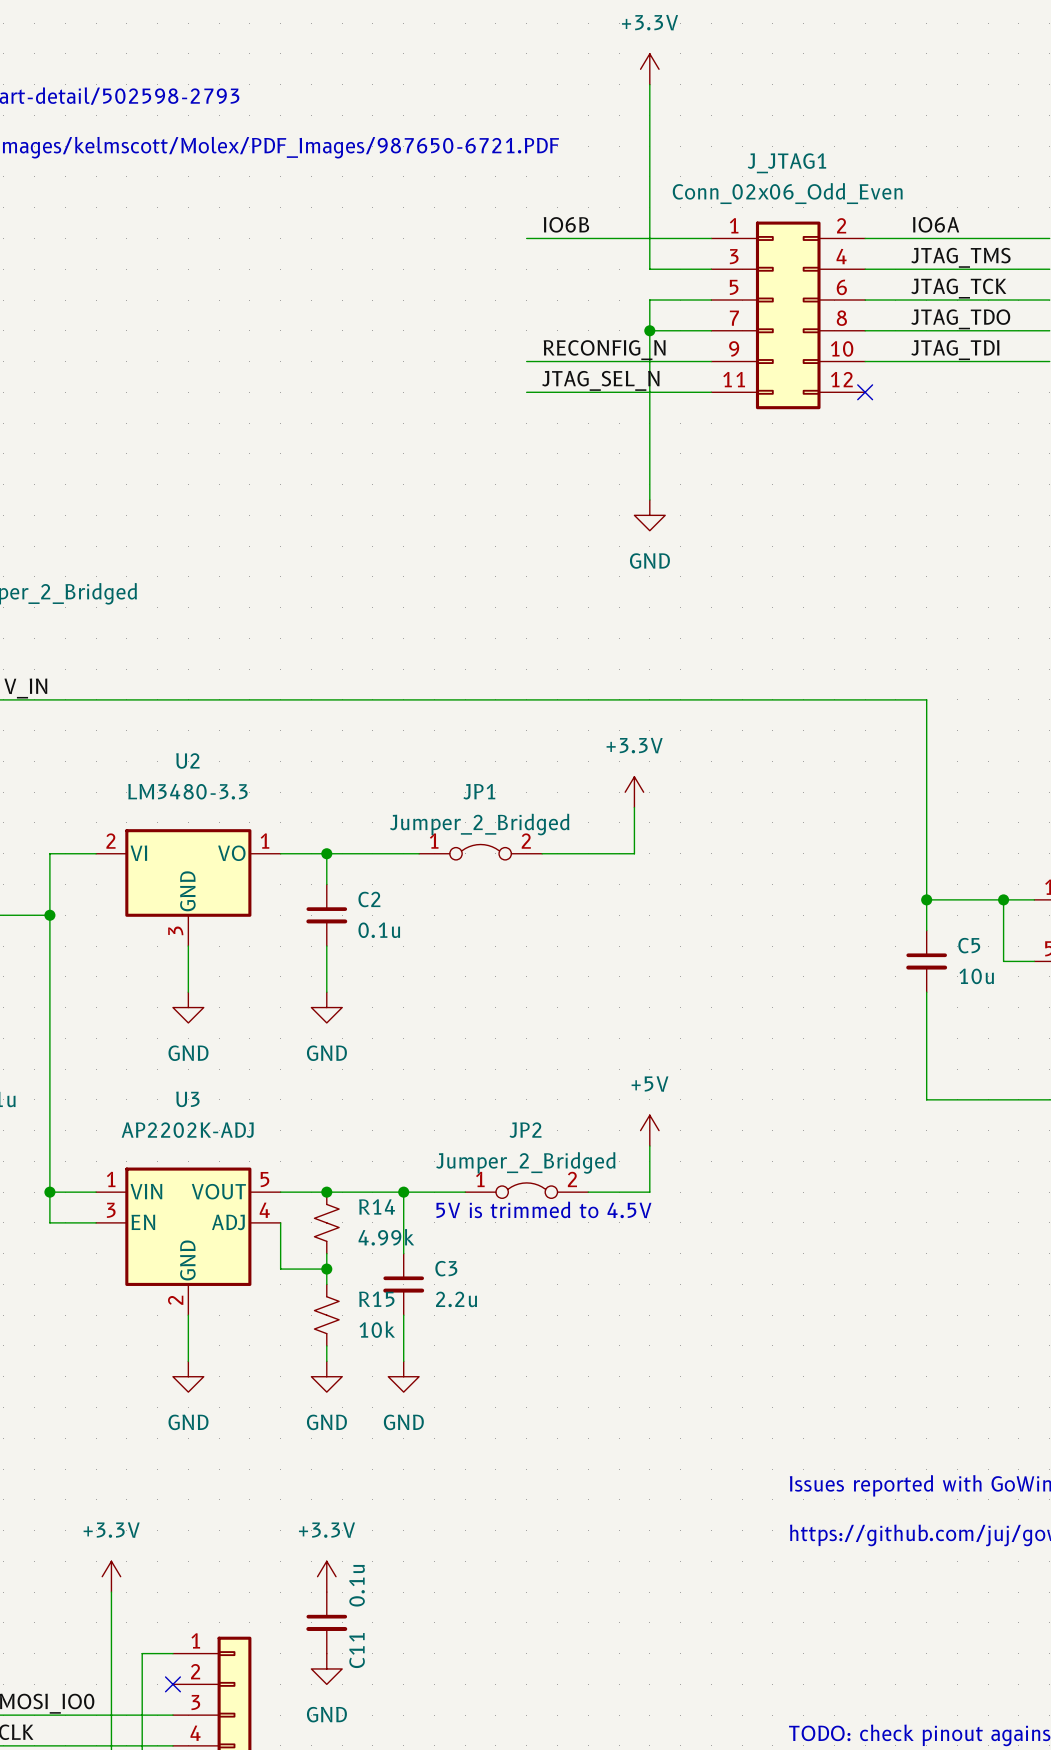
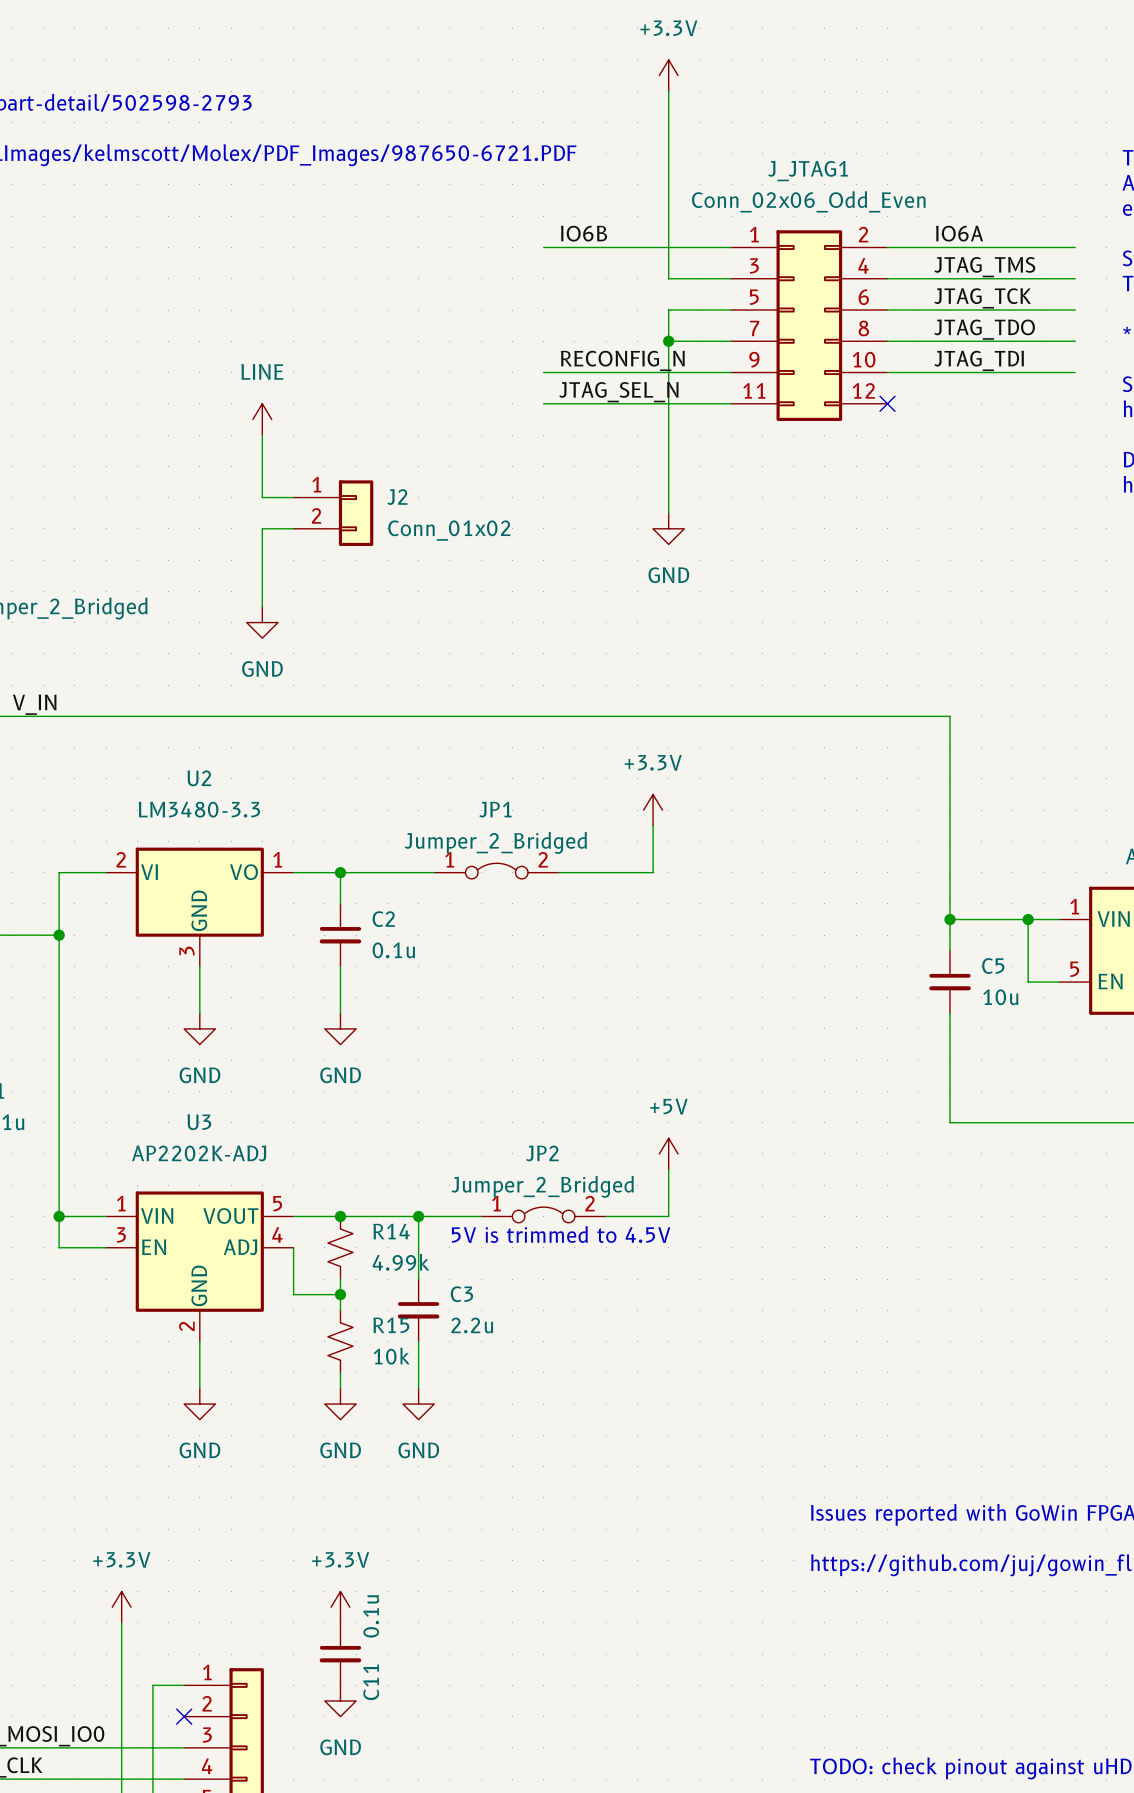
power symbol: none -> LINE (262, 419)
wire: none -> (262, 435) (262, 497) (293, 497)
J2: none -> Conn_01x02 (333, 513)
wire: none -> (293, 528) (262, 528) (262, 606)
power symbol: none -> GND (262, 622)

